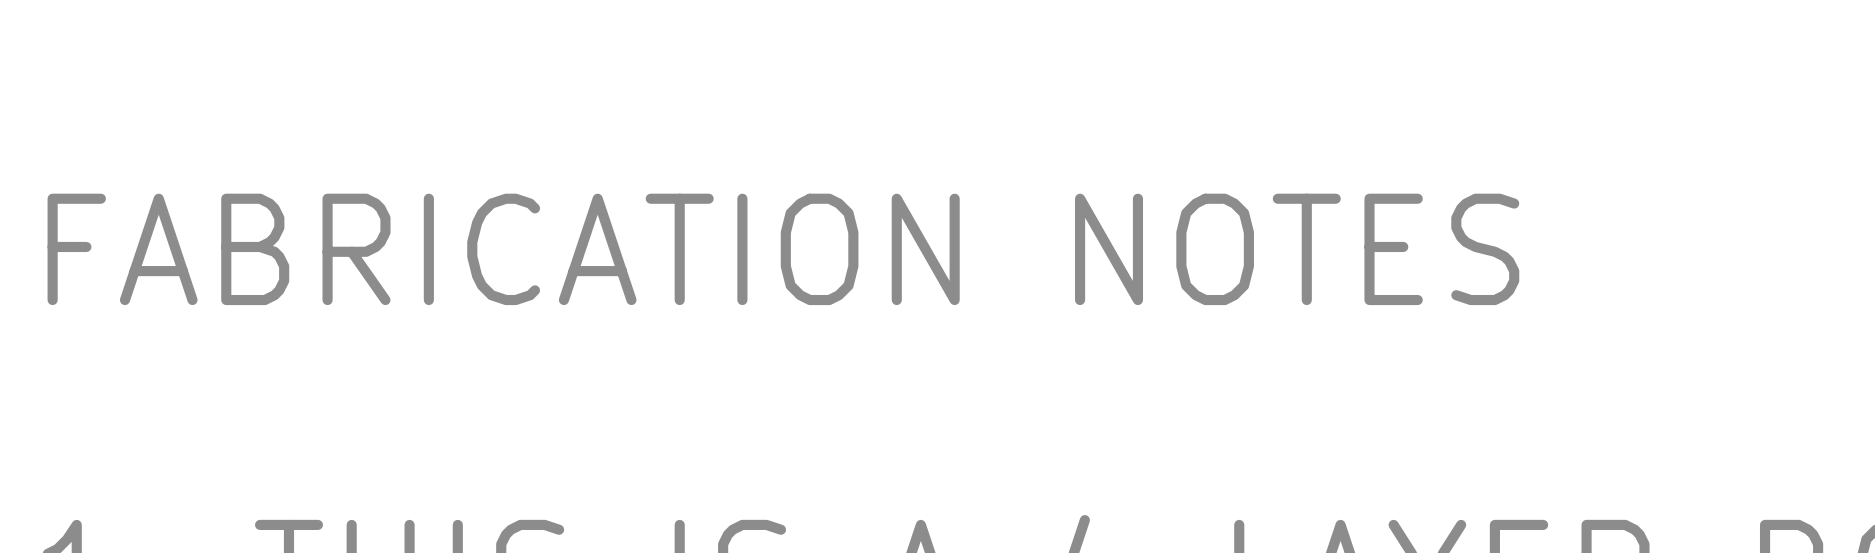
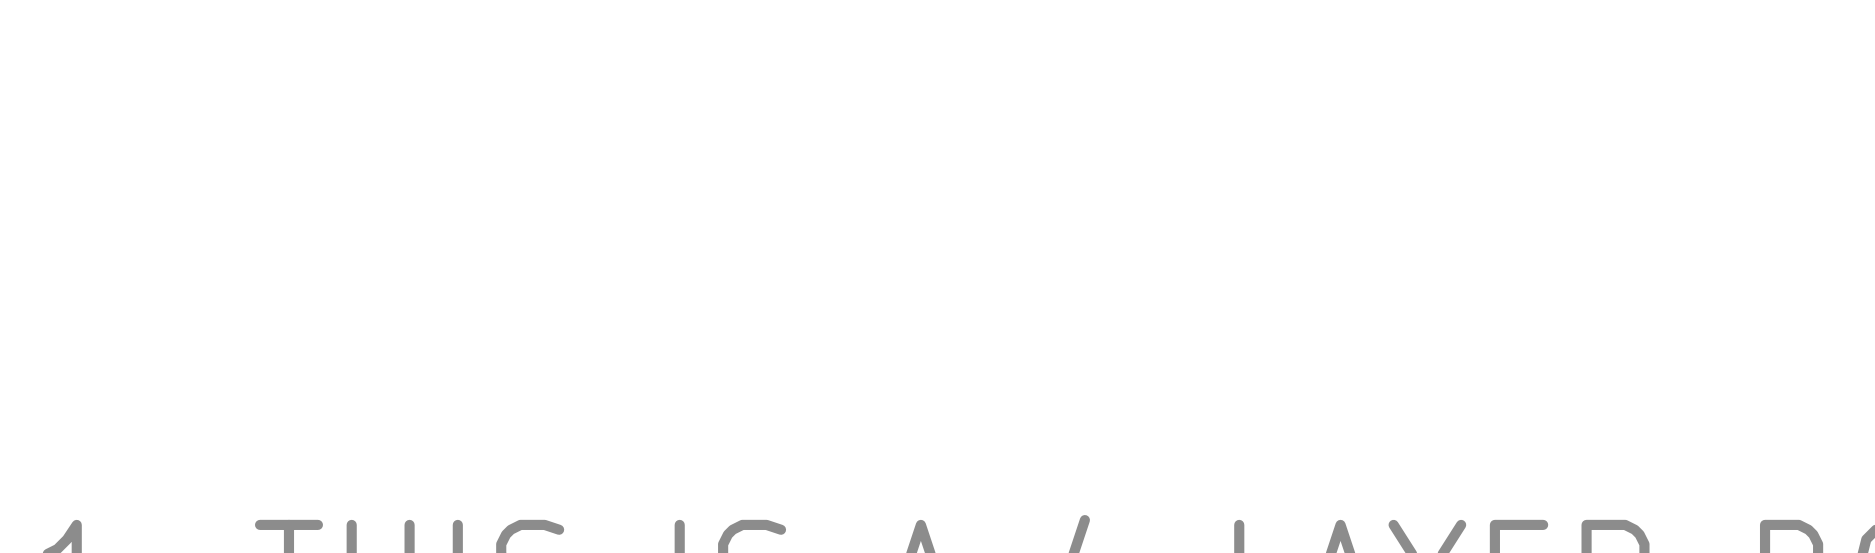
text: FABRICATION NOTES (783, 249) -> none

